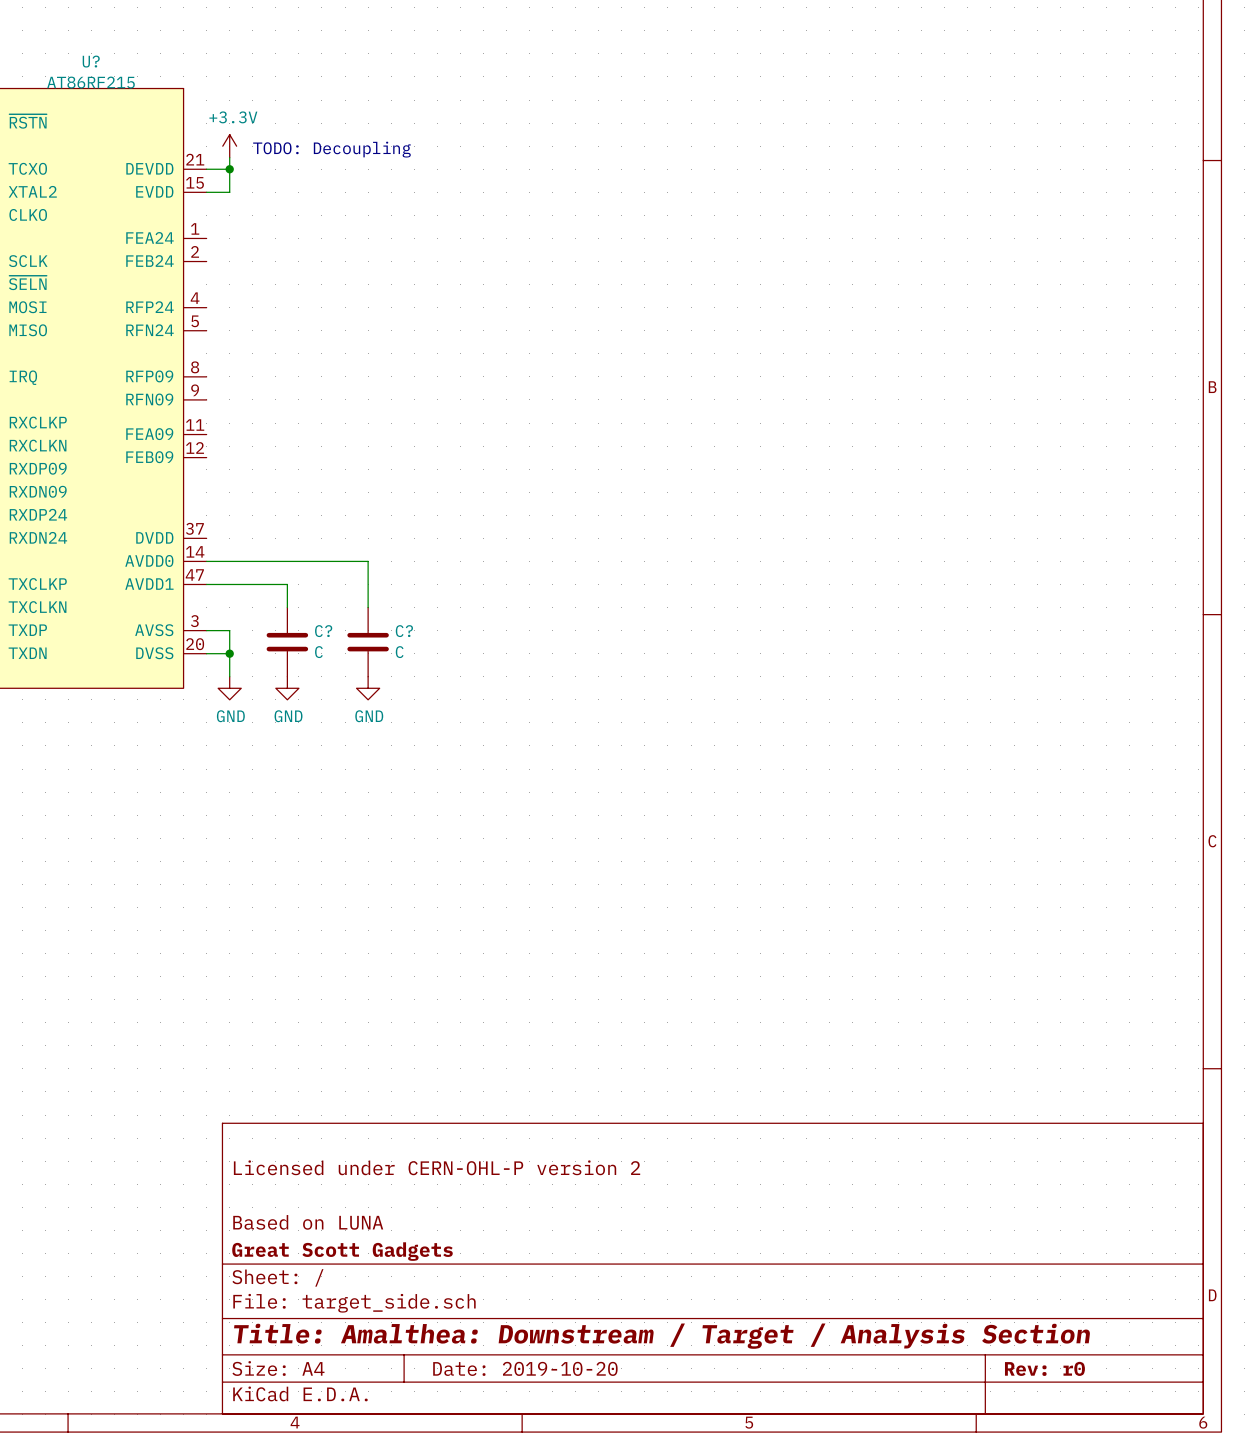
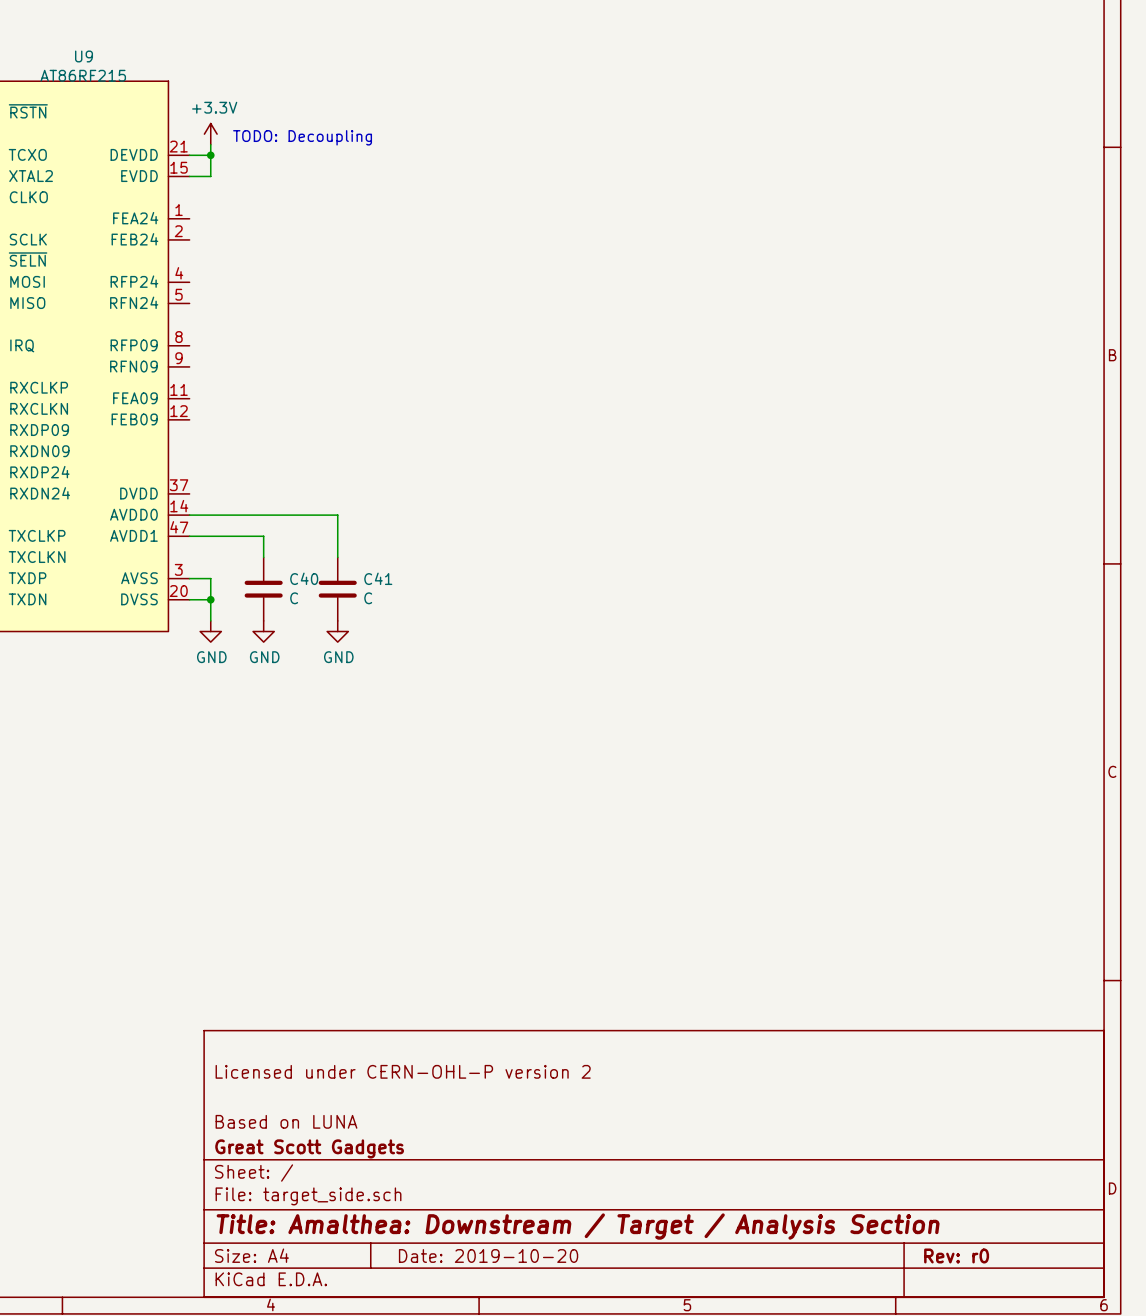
U? name: U? (91, 61) -> U9 (84, 56)
C? name: C? (323, 631) -> C40 (304, 578)
C? name: C? (404, 631) -> C41 (378, 578)

